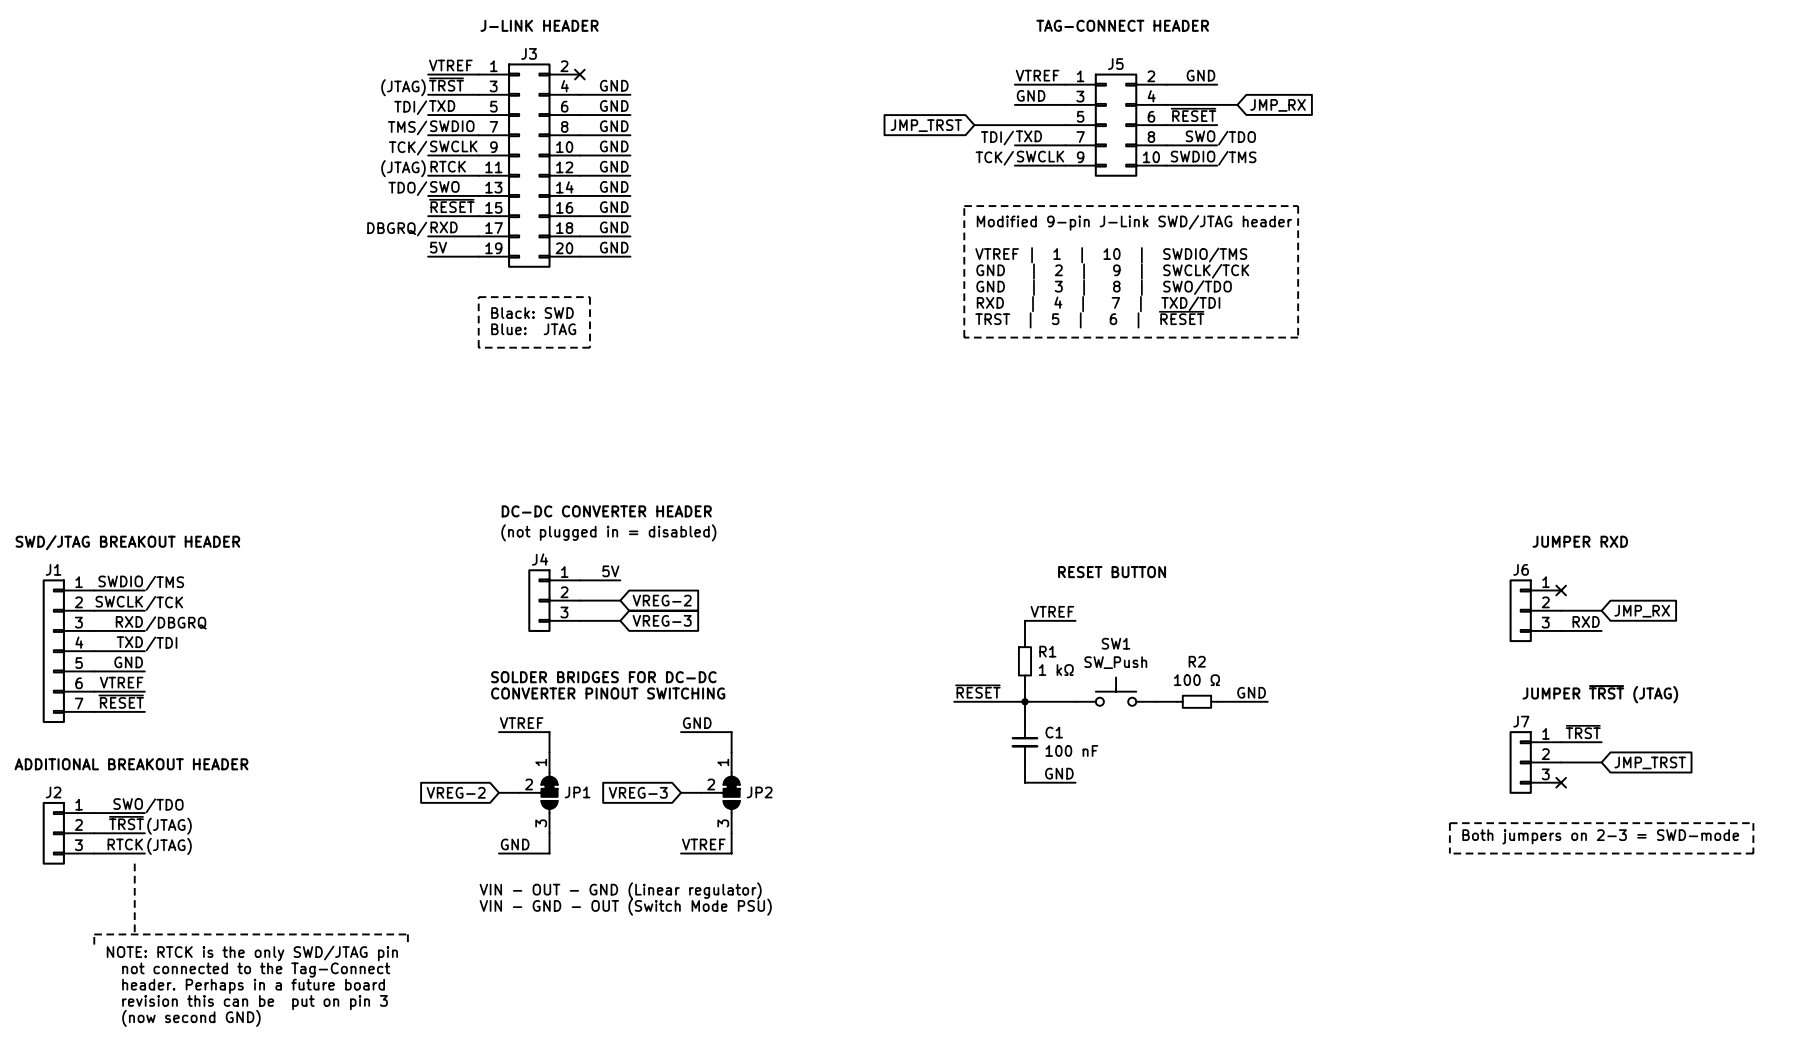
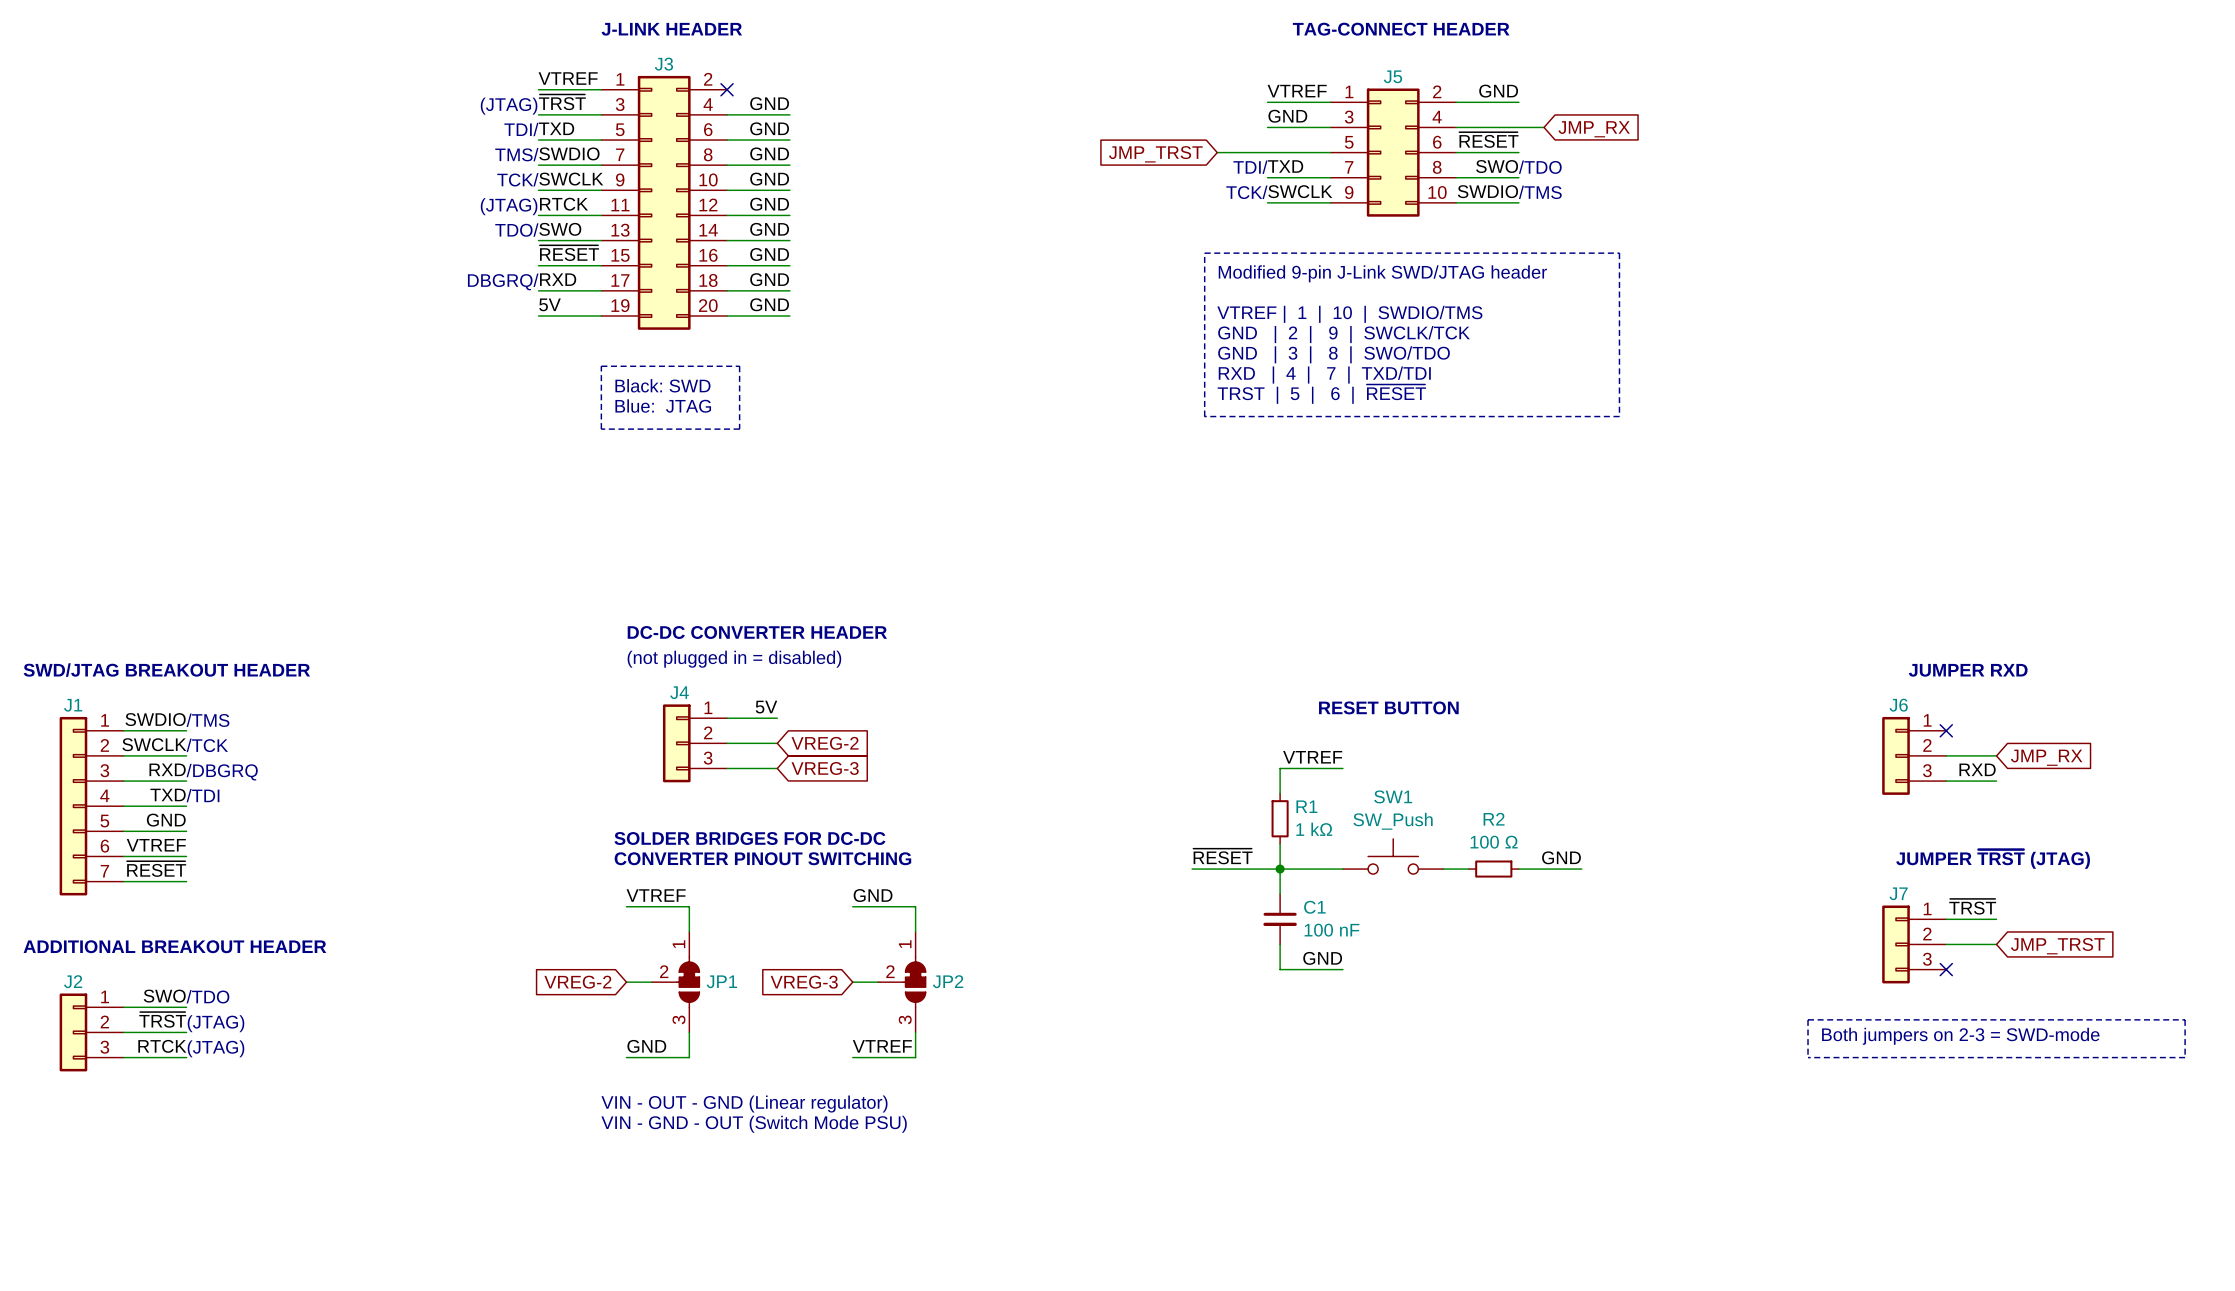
line: (134, 863) (134, 934) -> none
line: (94, 944) (94, 934) (407, 934) (407, 944) -> none
text: NOTE: RTCK is the only SWD/JTAG pin (252, 953) -> none
text: not connected to the Tag-Connect (256, 970) -> none
text: header. Perhaps in a future board (253, 986) -> none
text: revision this can be put on pin 3 (255, 1002) -> none
text: (now second GND) (191, 1018) -> none

